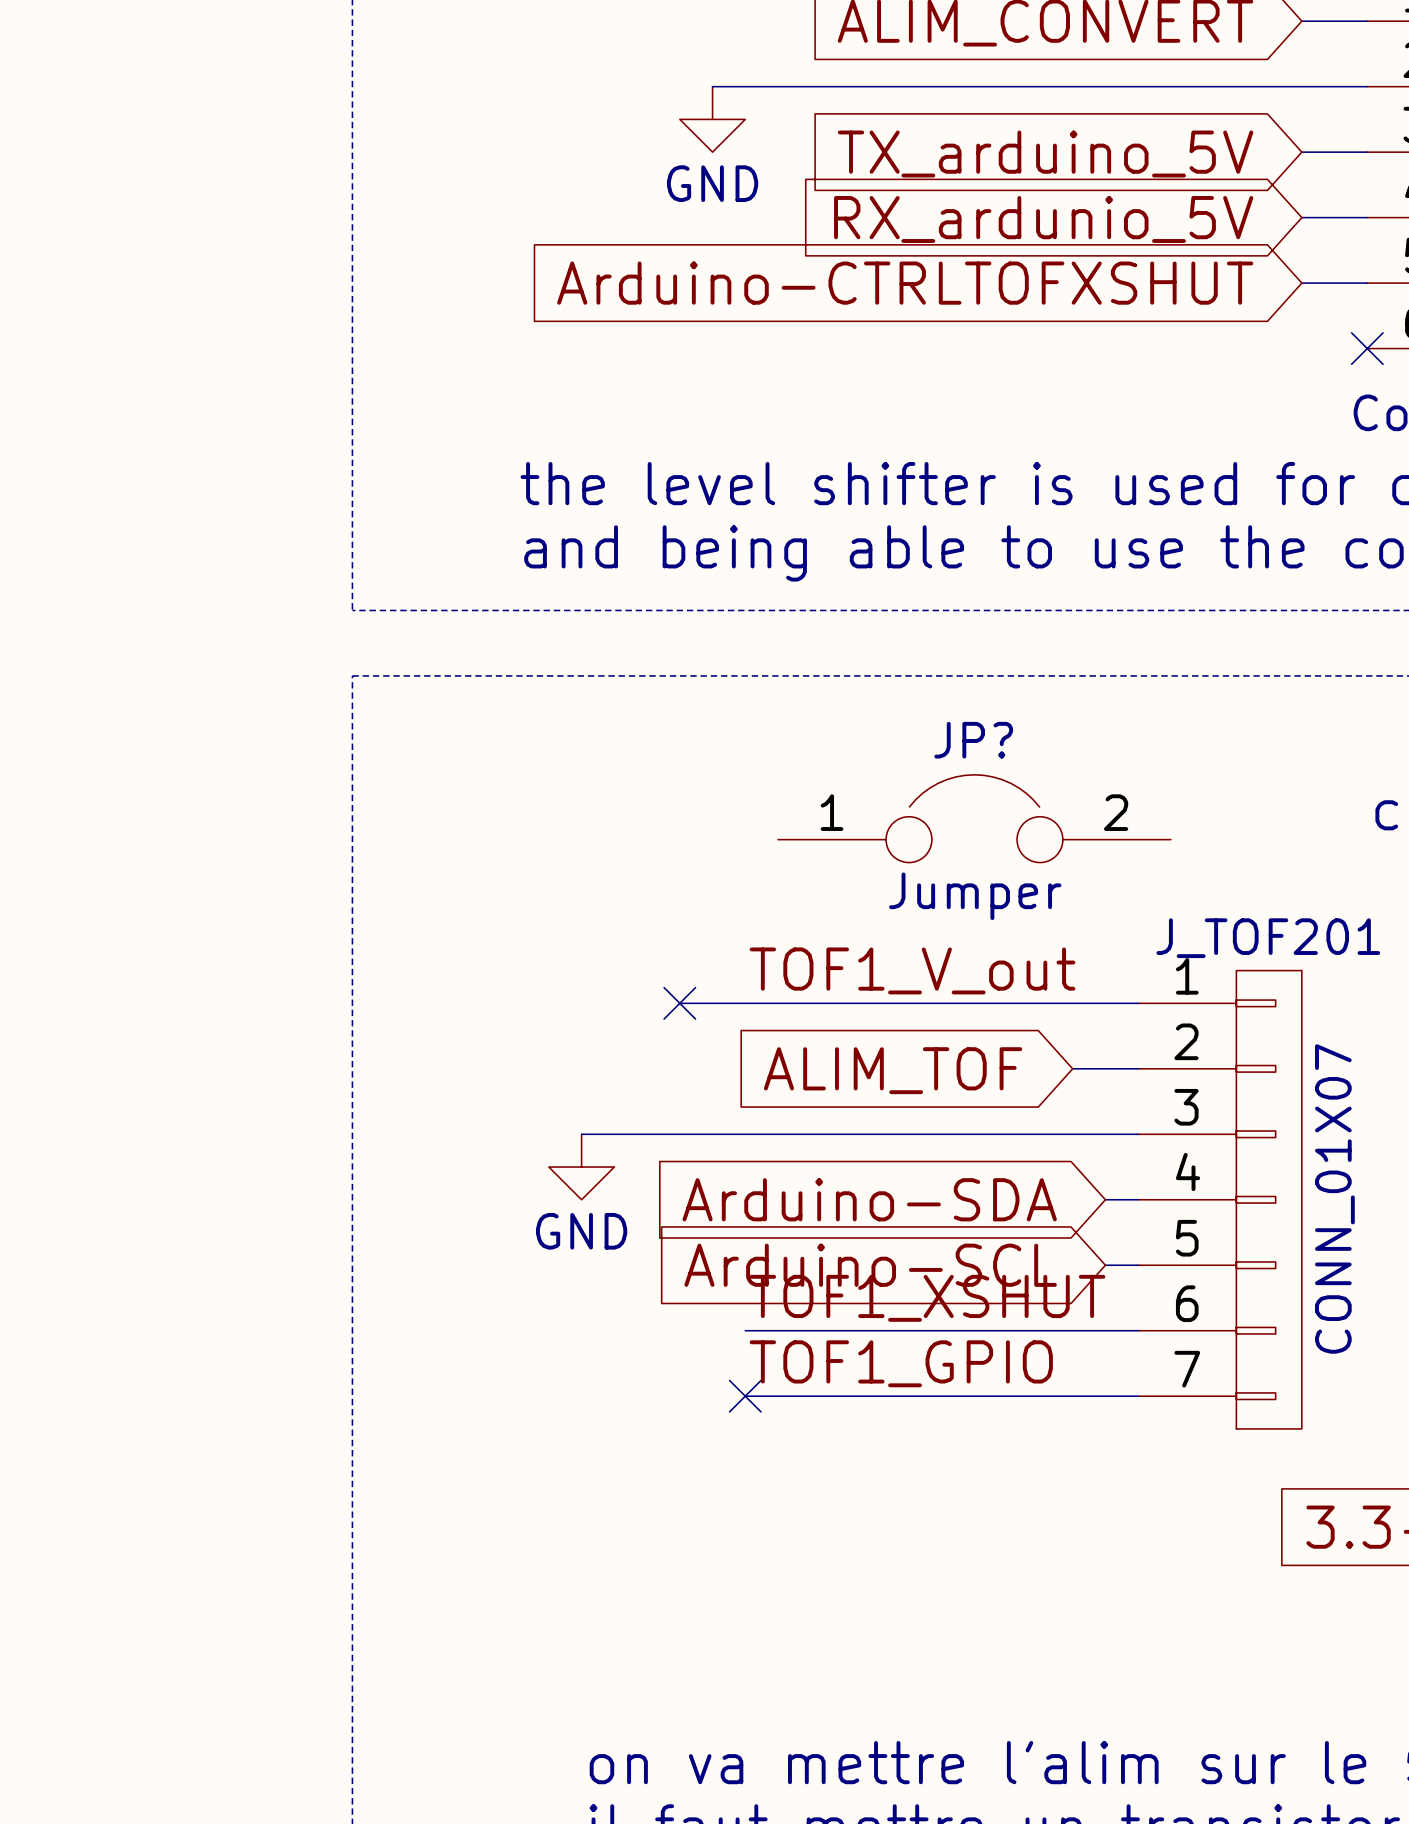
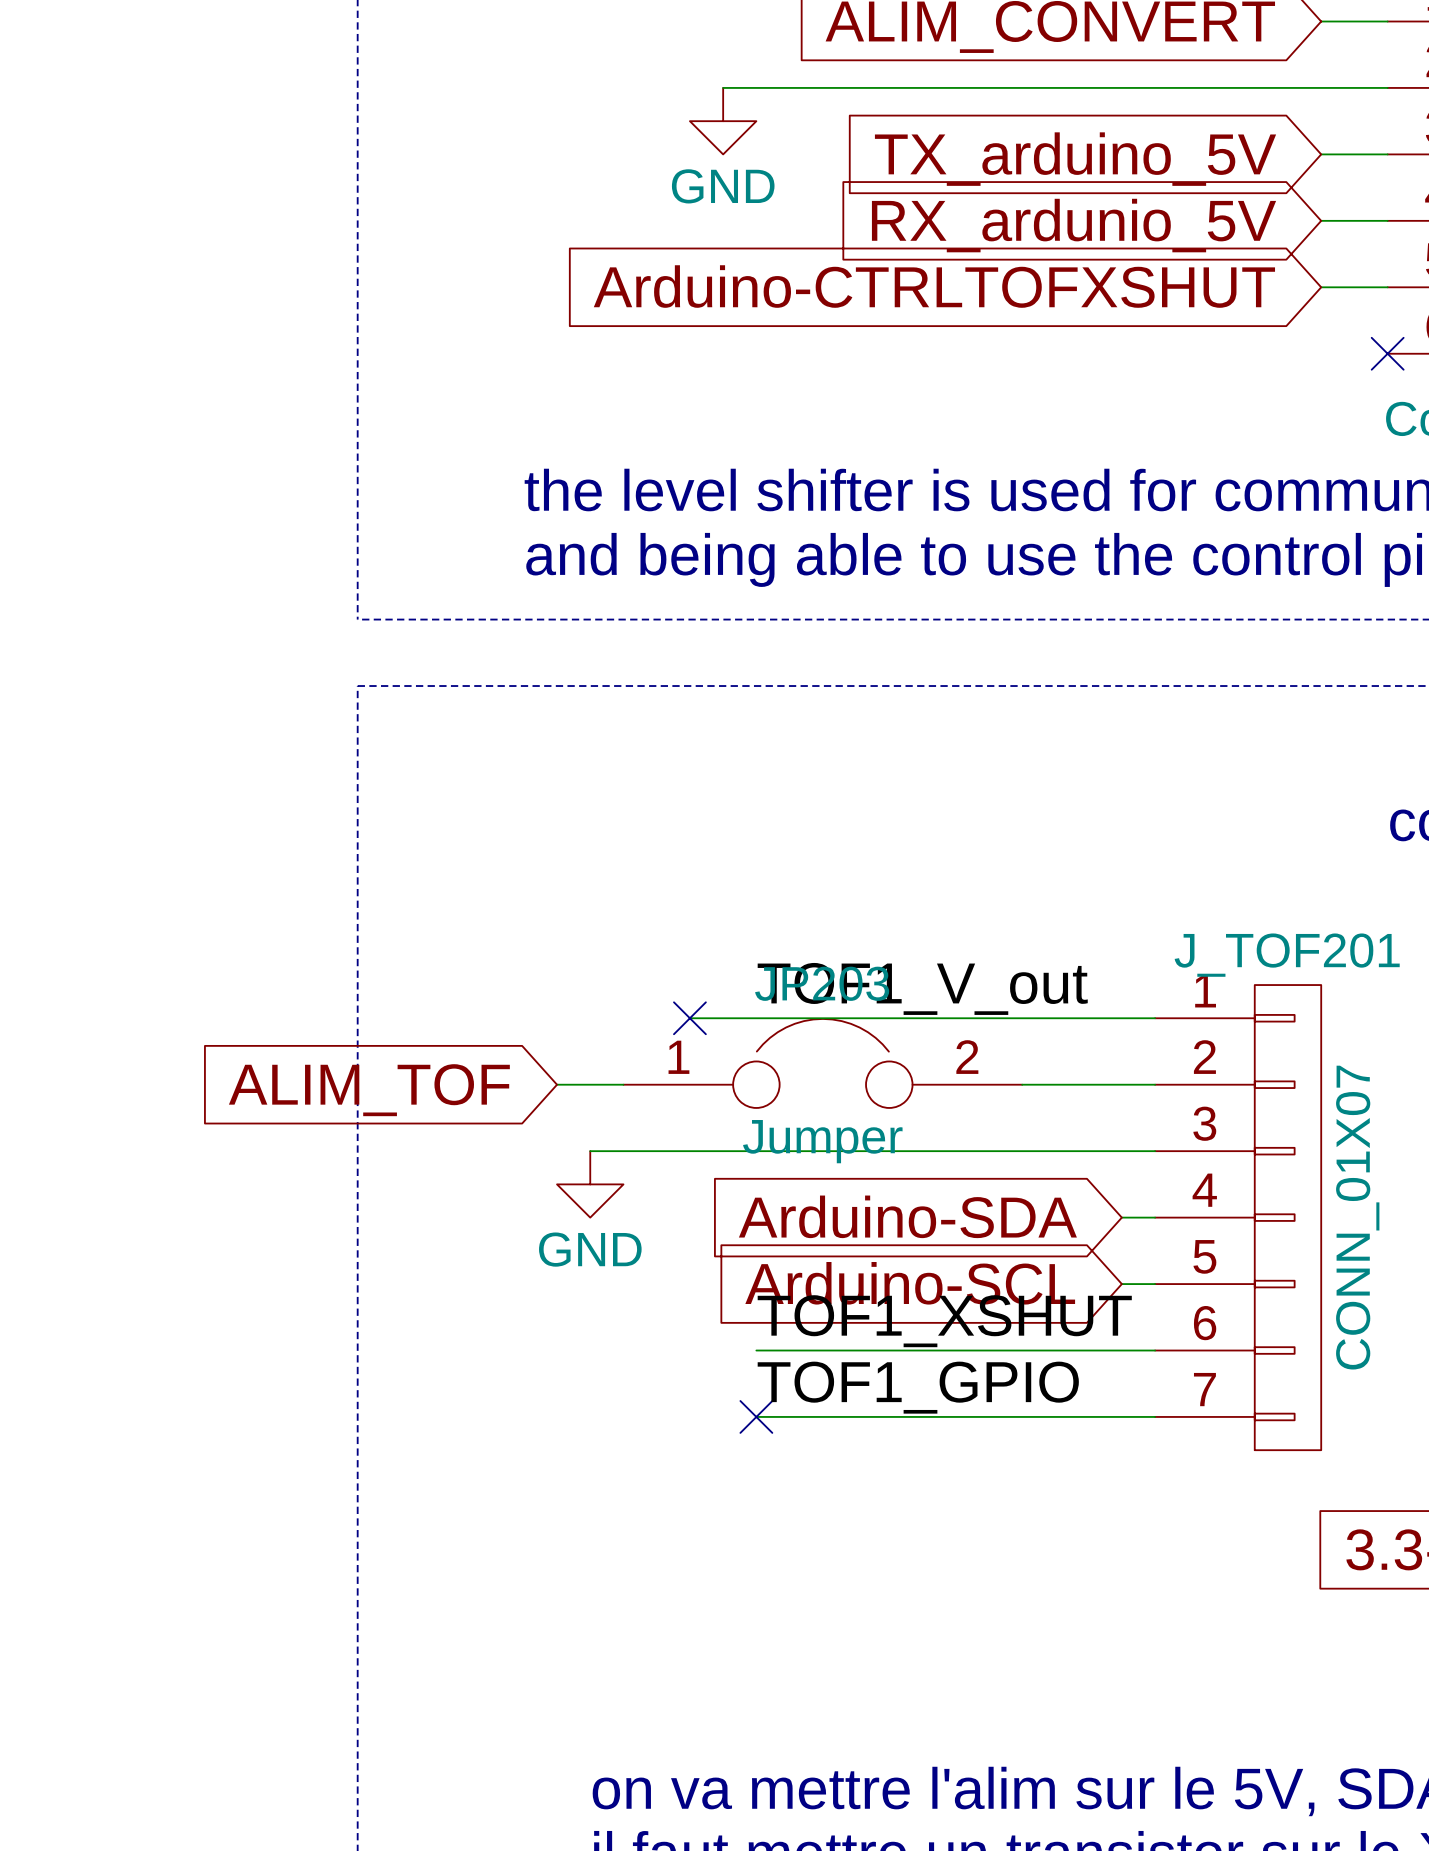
JP?: Jumper (974, 818) -> none
JP203: none -> Jumper (822, 1063)
wire: none -> (557, 1084) (623, 1084)
wire: none -> (1022, 1084) (1088, 1084)
global label: none -> ALIM_TOF (369, 1090)
global label: ALIM_TOF (893, 1070) -> none

